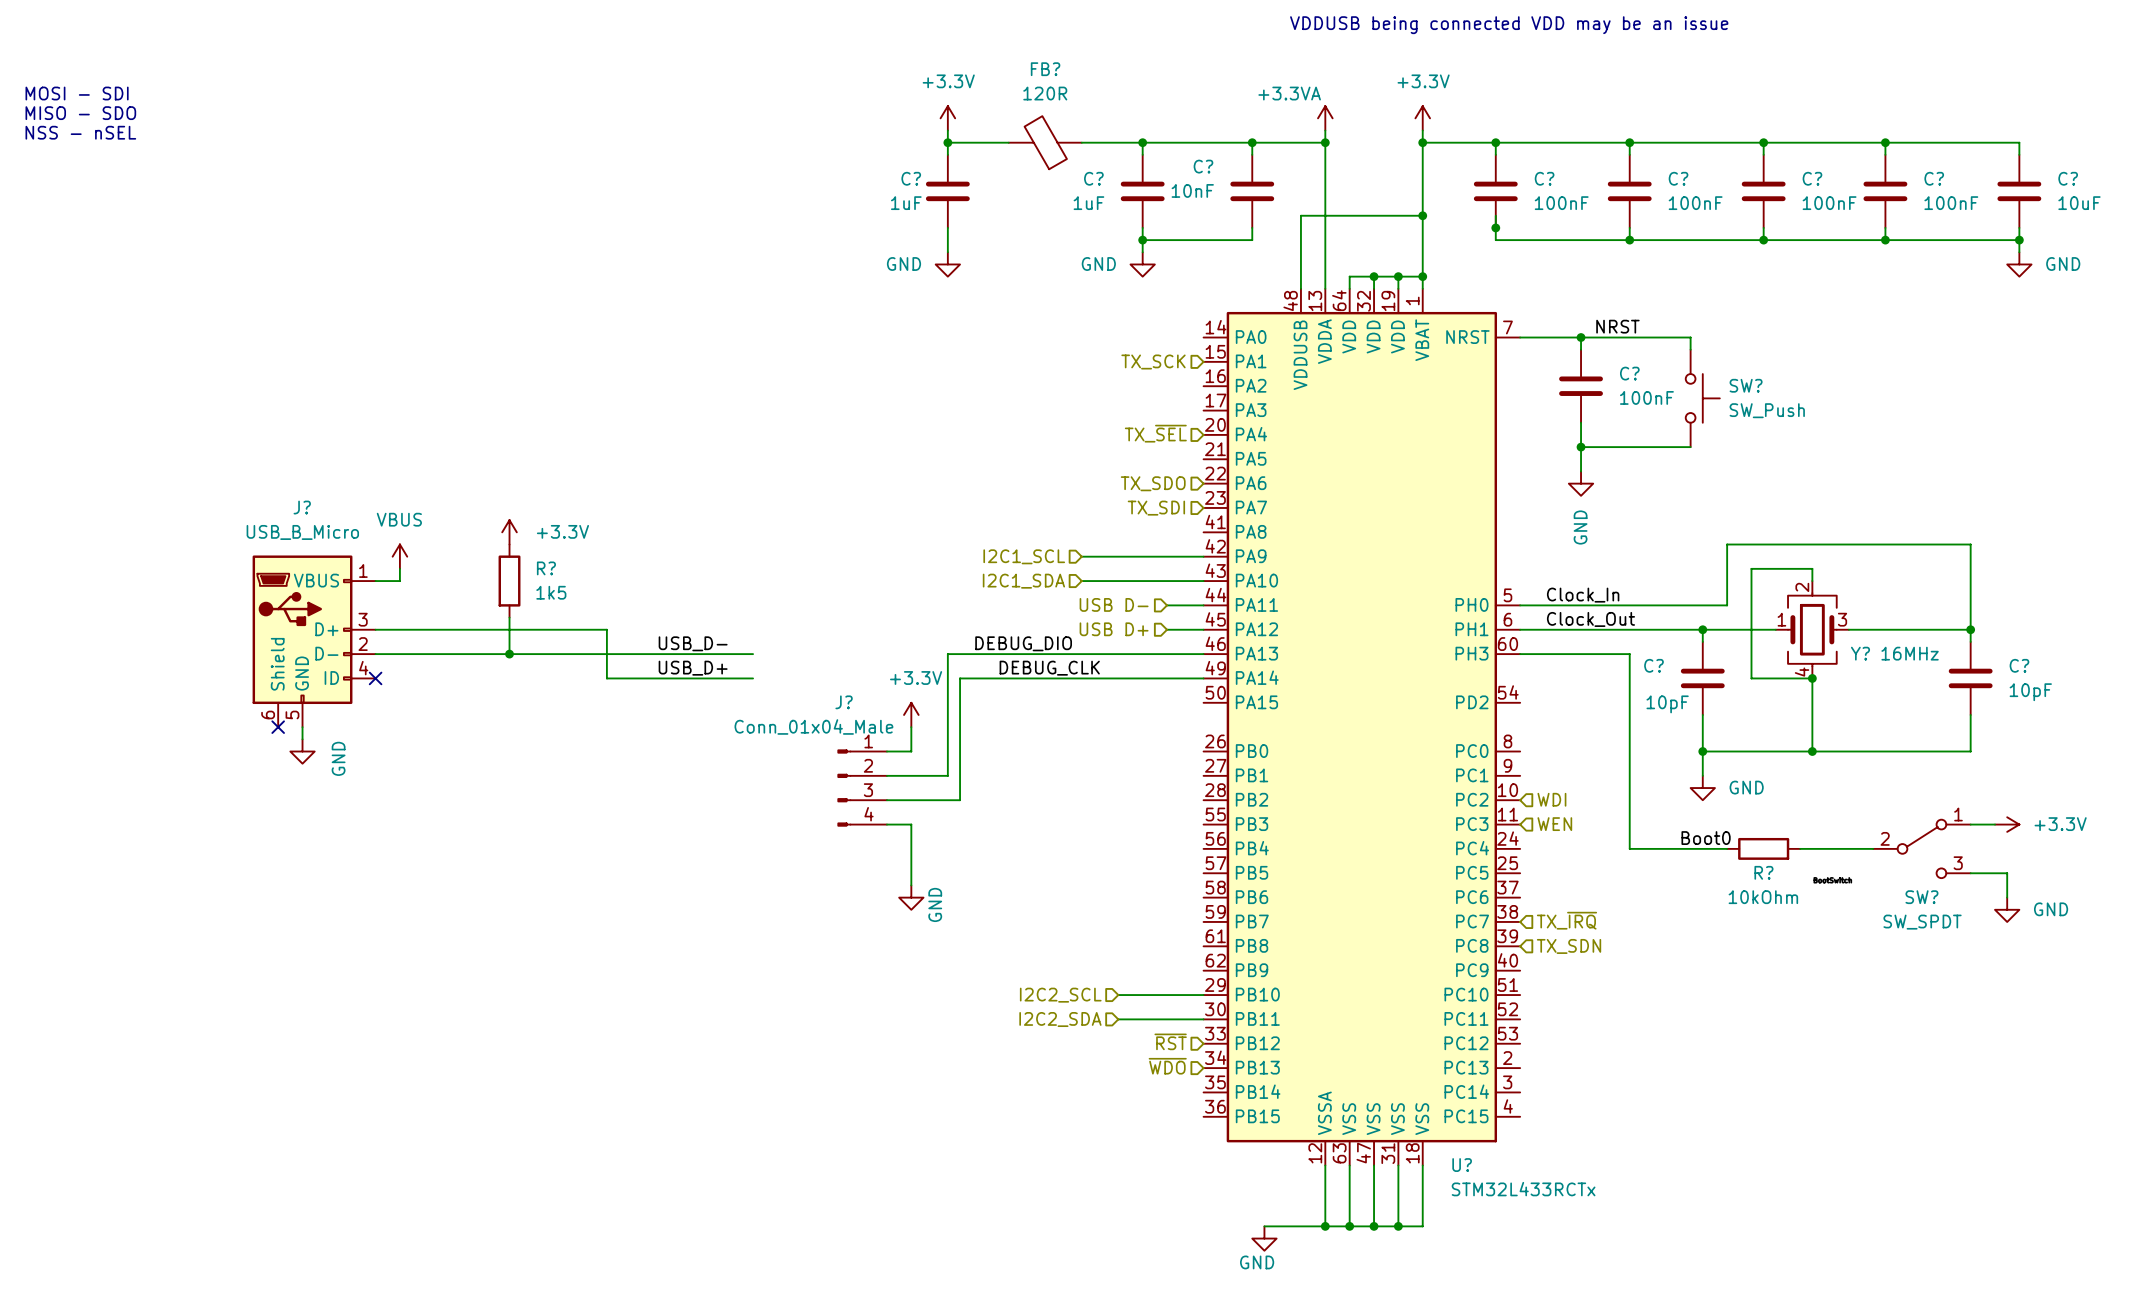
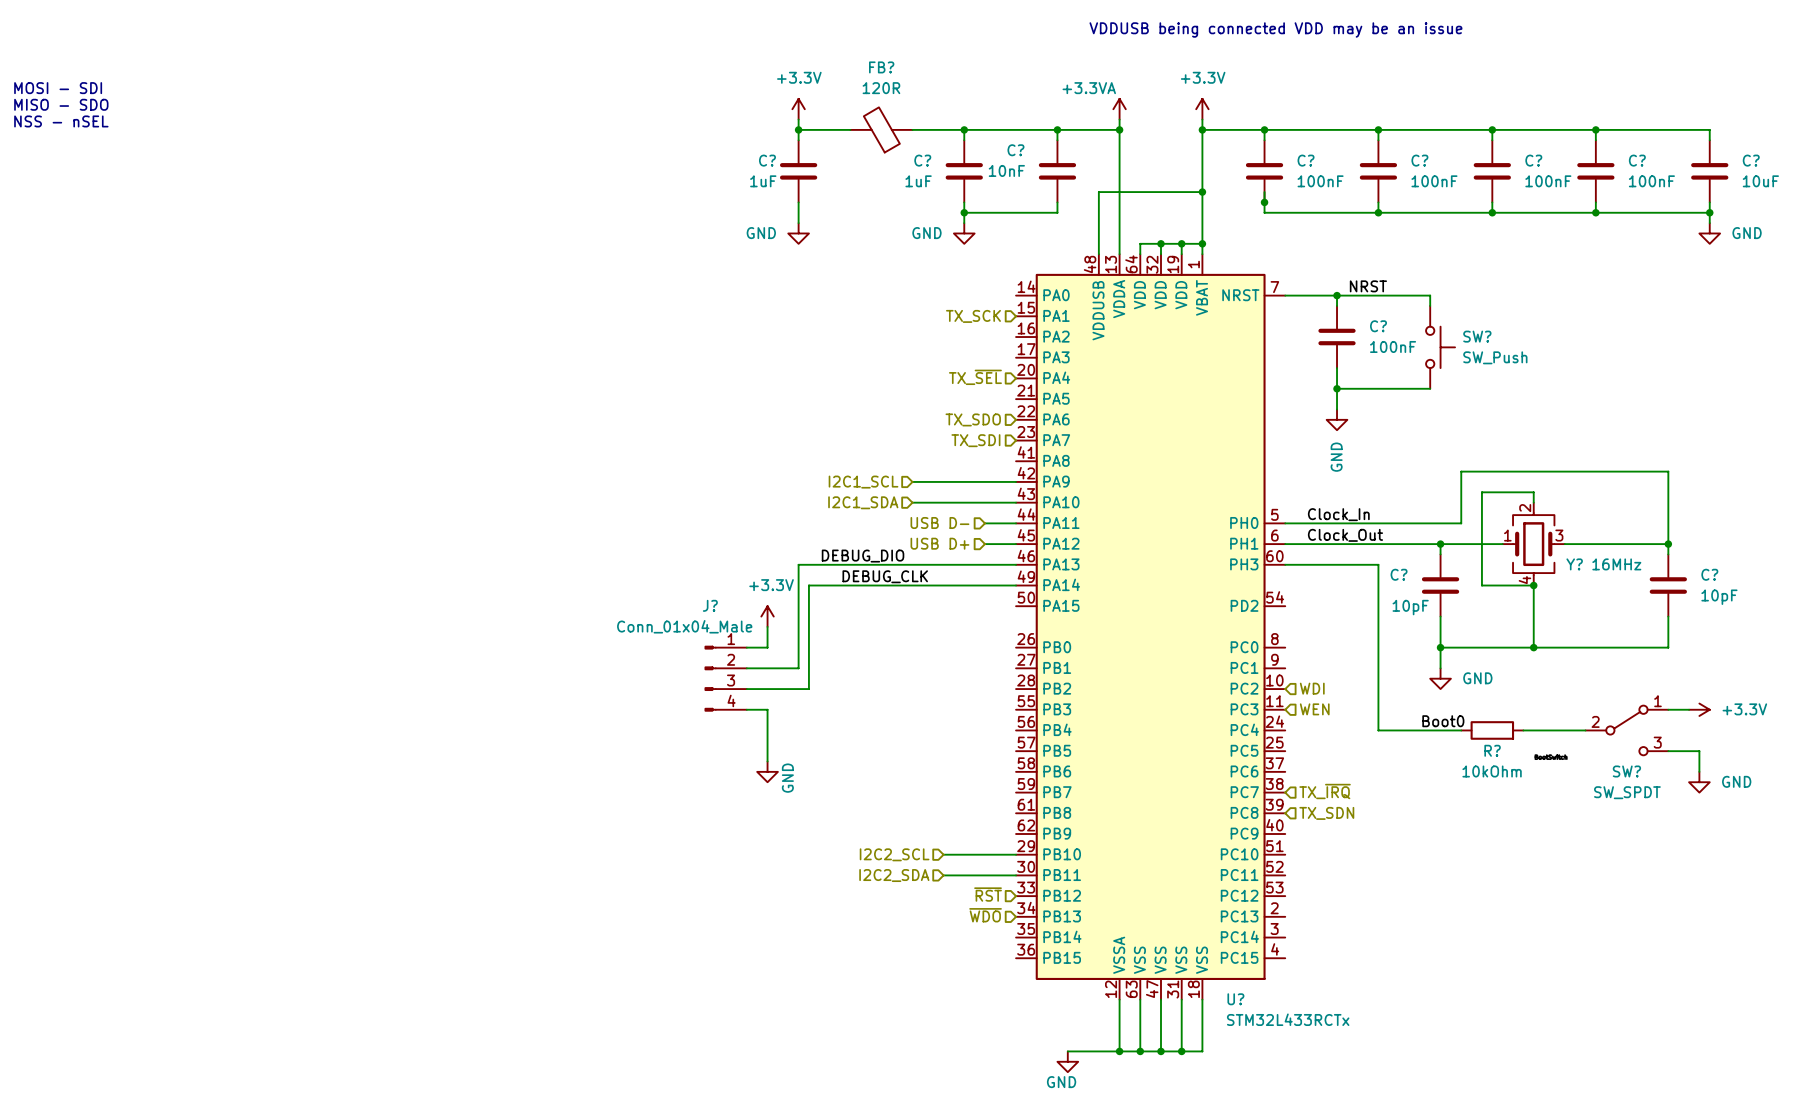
power symbol: +3.3V (509, 532) -> none
power symbol: VBUS (399, 556) -> none
wire: (399, 568) (399, 581) (375, 581) -> none
R?: 1k5 (509, 581) -> none
wire: (509, 617) (509, 654) -> none
wire: (375, 629) (606, 629) (606, 678) (753, 678) -> none
J?: USB_B_Micro (314, 641) -> none
label: USB_D- (693, 643) -> none
wire: (375, 654) (753, 654) -> none
junction: (509, 654) -> none
label: USB_D+ (693, 668) -> none
no-connect mark: (375, 678) -> none
no-connect mark: (278, 727) -> none
wire: (302, 727) (302, 739) -> none
power symbol: GND (302, 751) -> none

